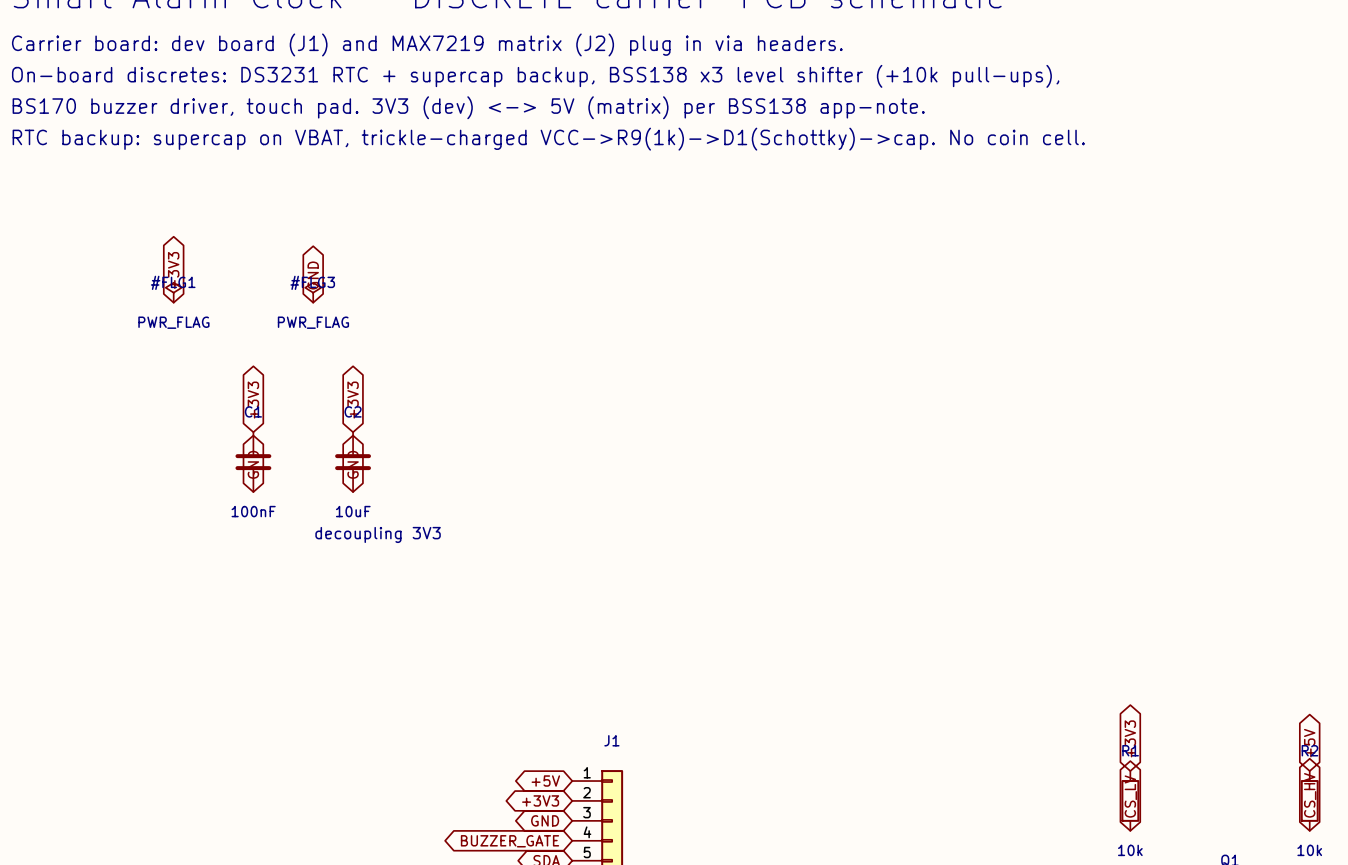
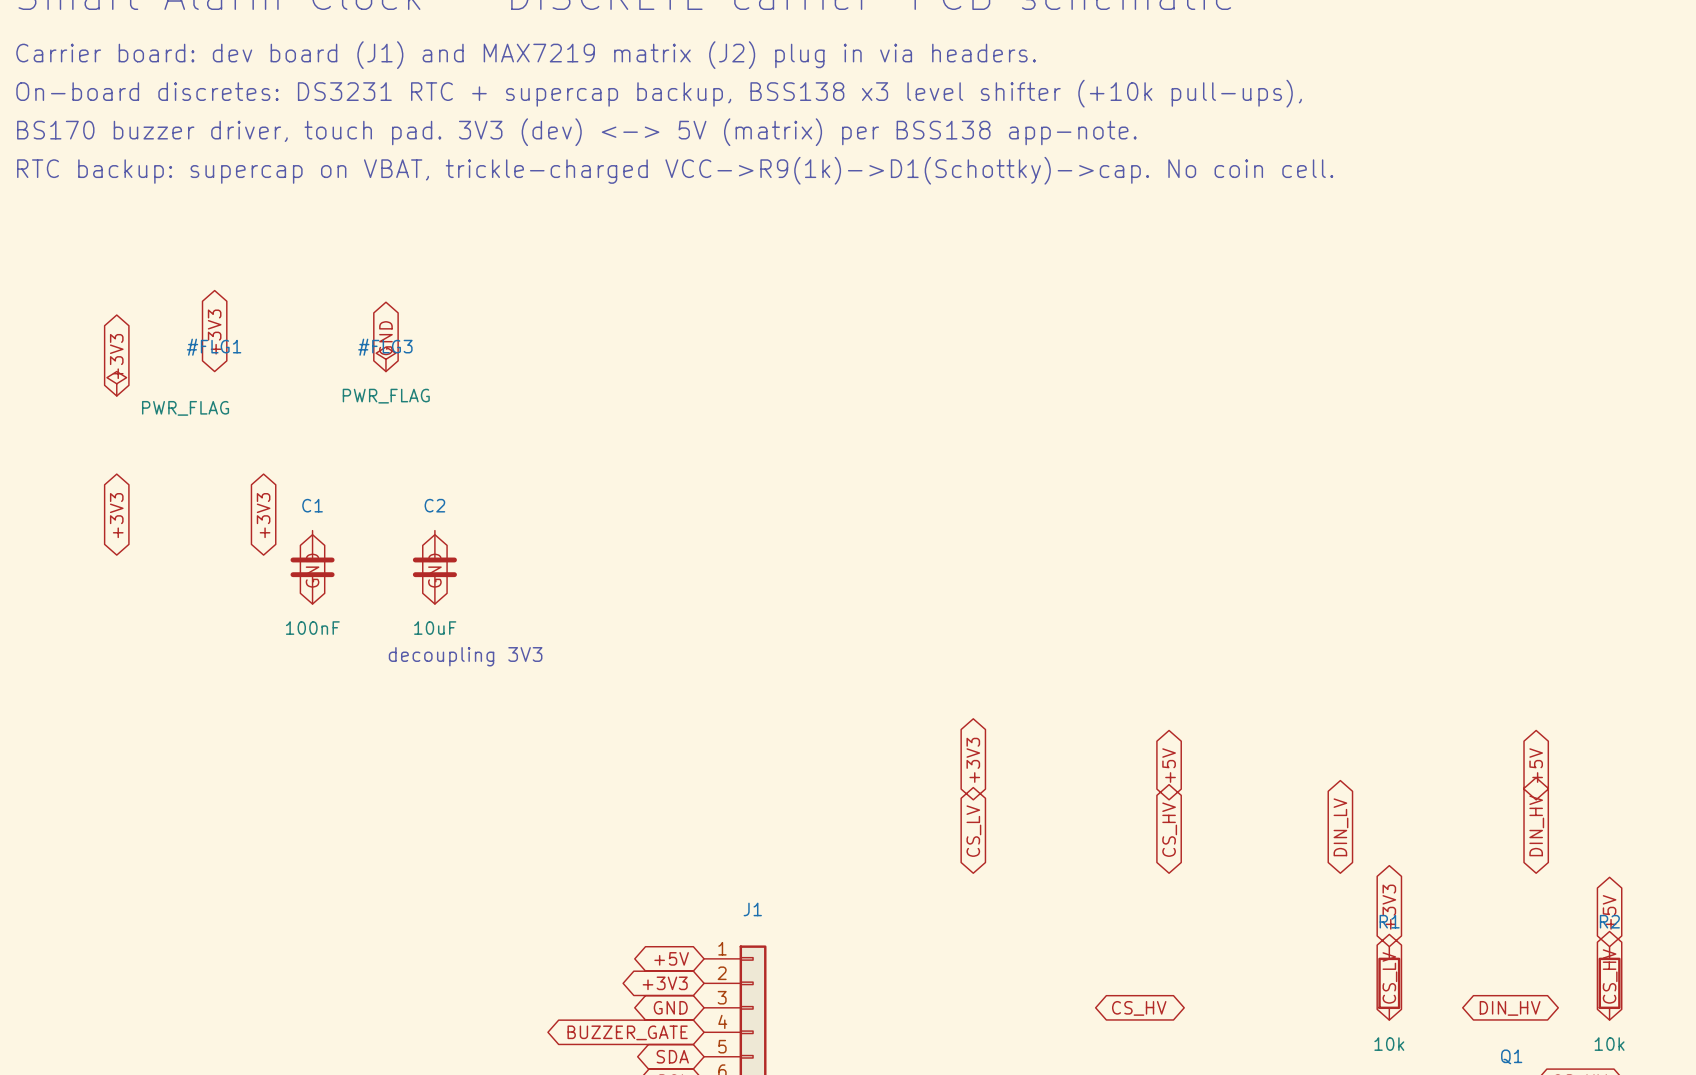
global label: none -> +3V3 (116, 356)
#FLG1 position: PWR_FLAG (173, 292) -> PWR_FLAG (116, 383)
#FLG1 text position: PWR_FLAG (173, 322) -> PWR_FLAG (185, 408)
global label position: +3V3 (253, 400) -> +3V3 (263, 515)
global label: +3V3 (353, 400) -> none
global label: none -> +3V3 (116, 515)
global label: none -> +3V3 (973, 760)
global label: none -> +5V (1169, 765)
global label: none -> +5V (1536, 765)
global label: none -> DIN_HV (1536, 825)
global label: none -> DIN_LV (1340, 827)
global label: none -> CS_HV (1169, 829)
global label: none -> CS_LV (973, 831)
global label: none -> CS_HV (1139, 1008)
global label: none -> DIN_HV (1510, 1008)

